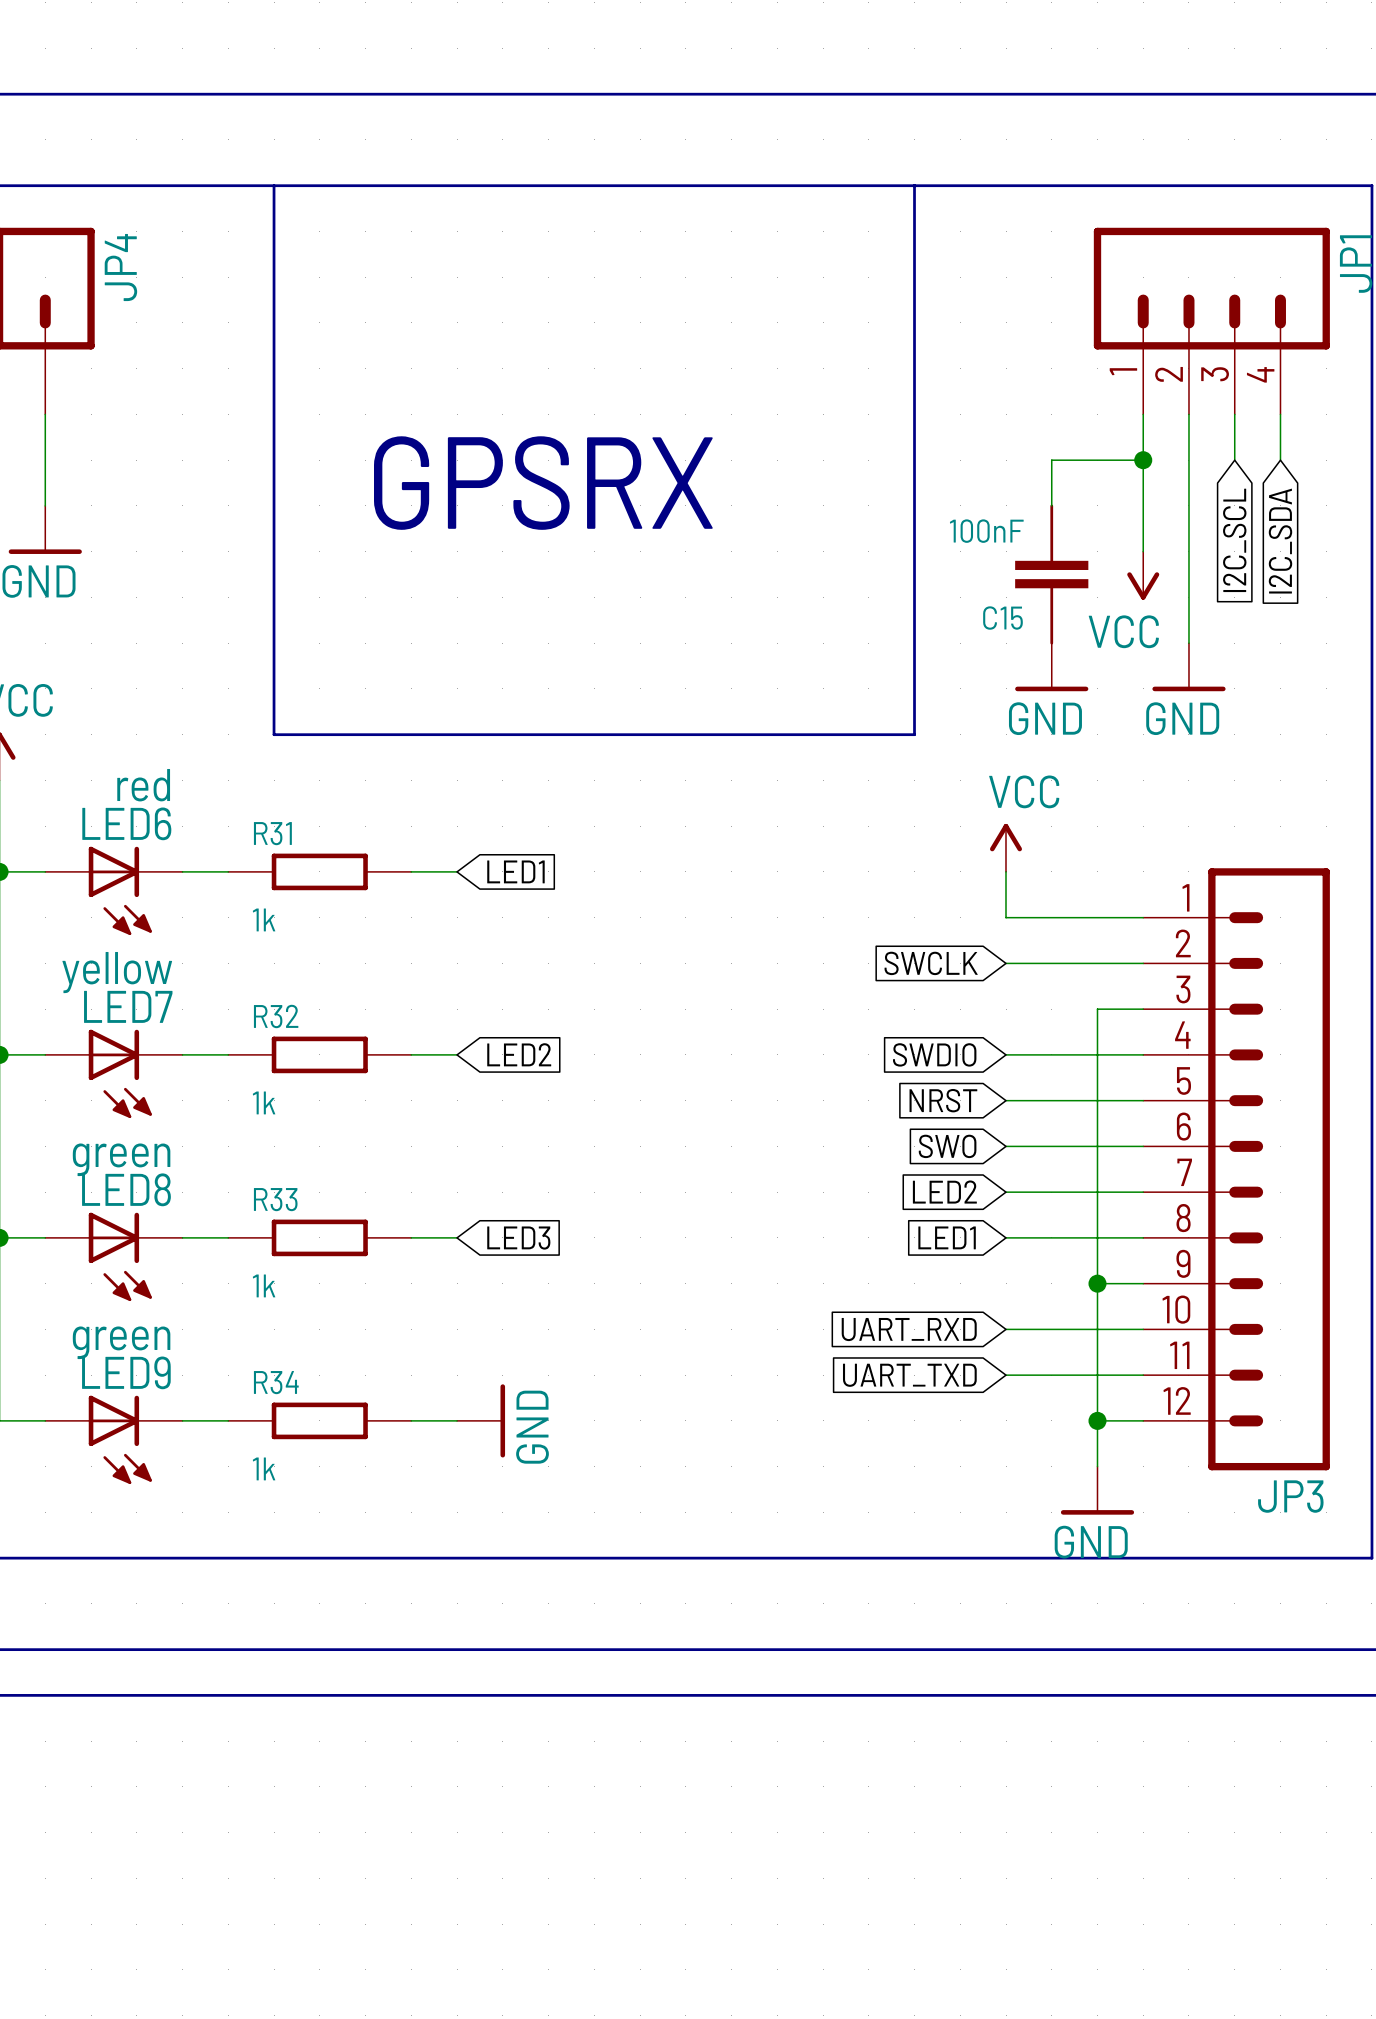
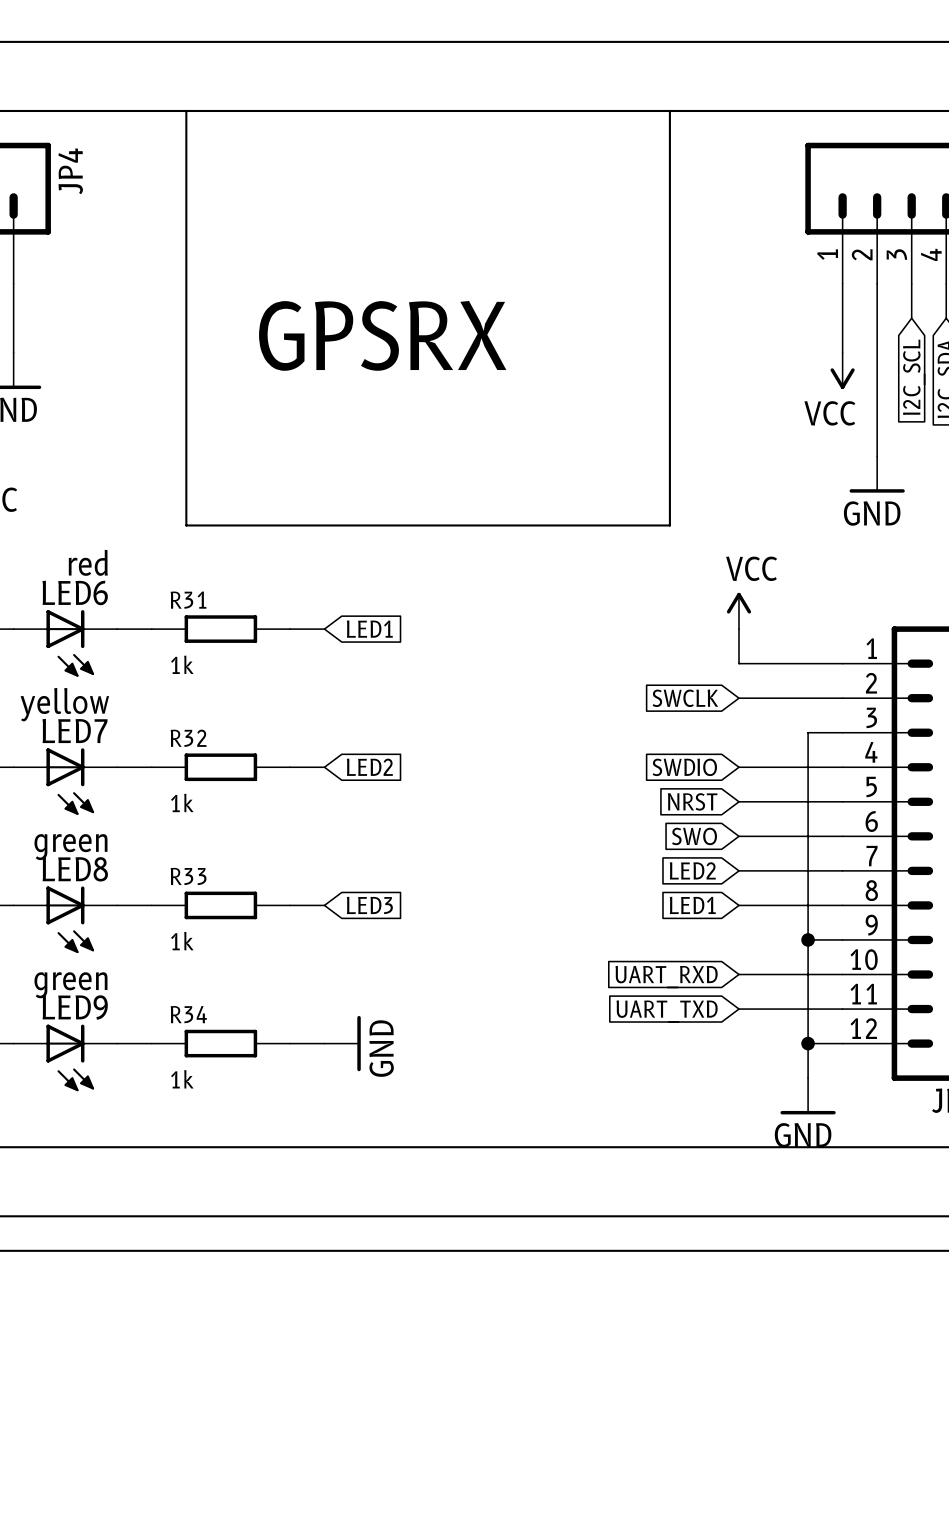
wire: (1143, 460) (1051, 460) (1051, 505) -> none
junction: (1143, 460) -> none
C15: 100nF (1051, 574) -> none
power symbol position: VCC (1143, 575) -> VCC (842, 370)
power symbol: GND (1051, 667) -> none

